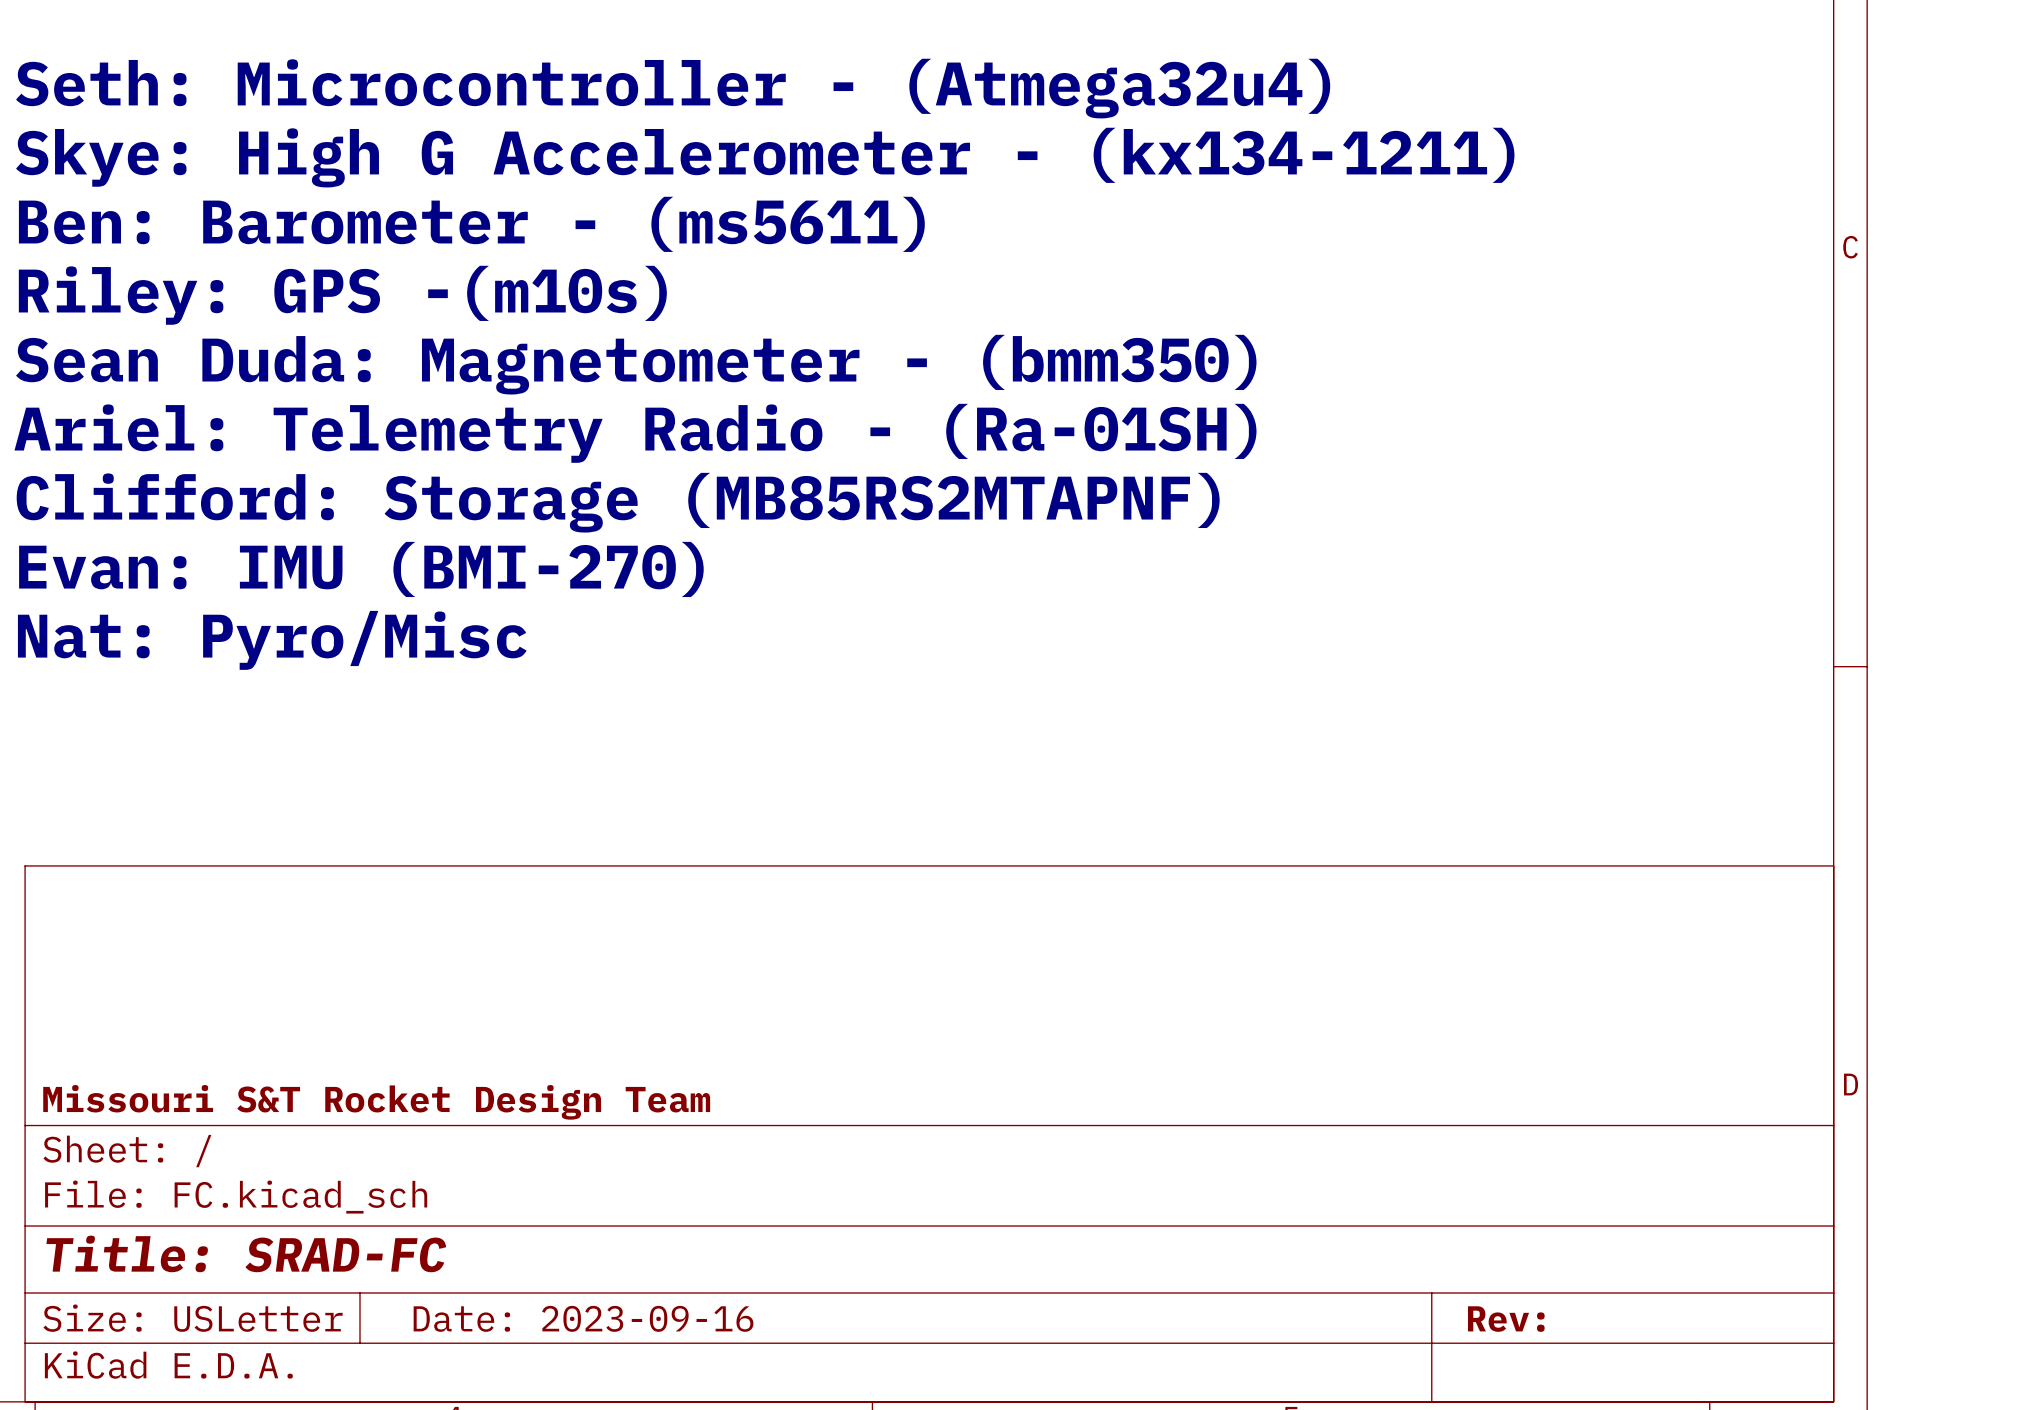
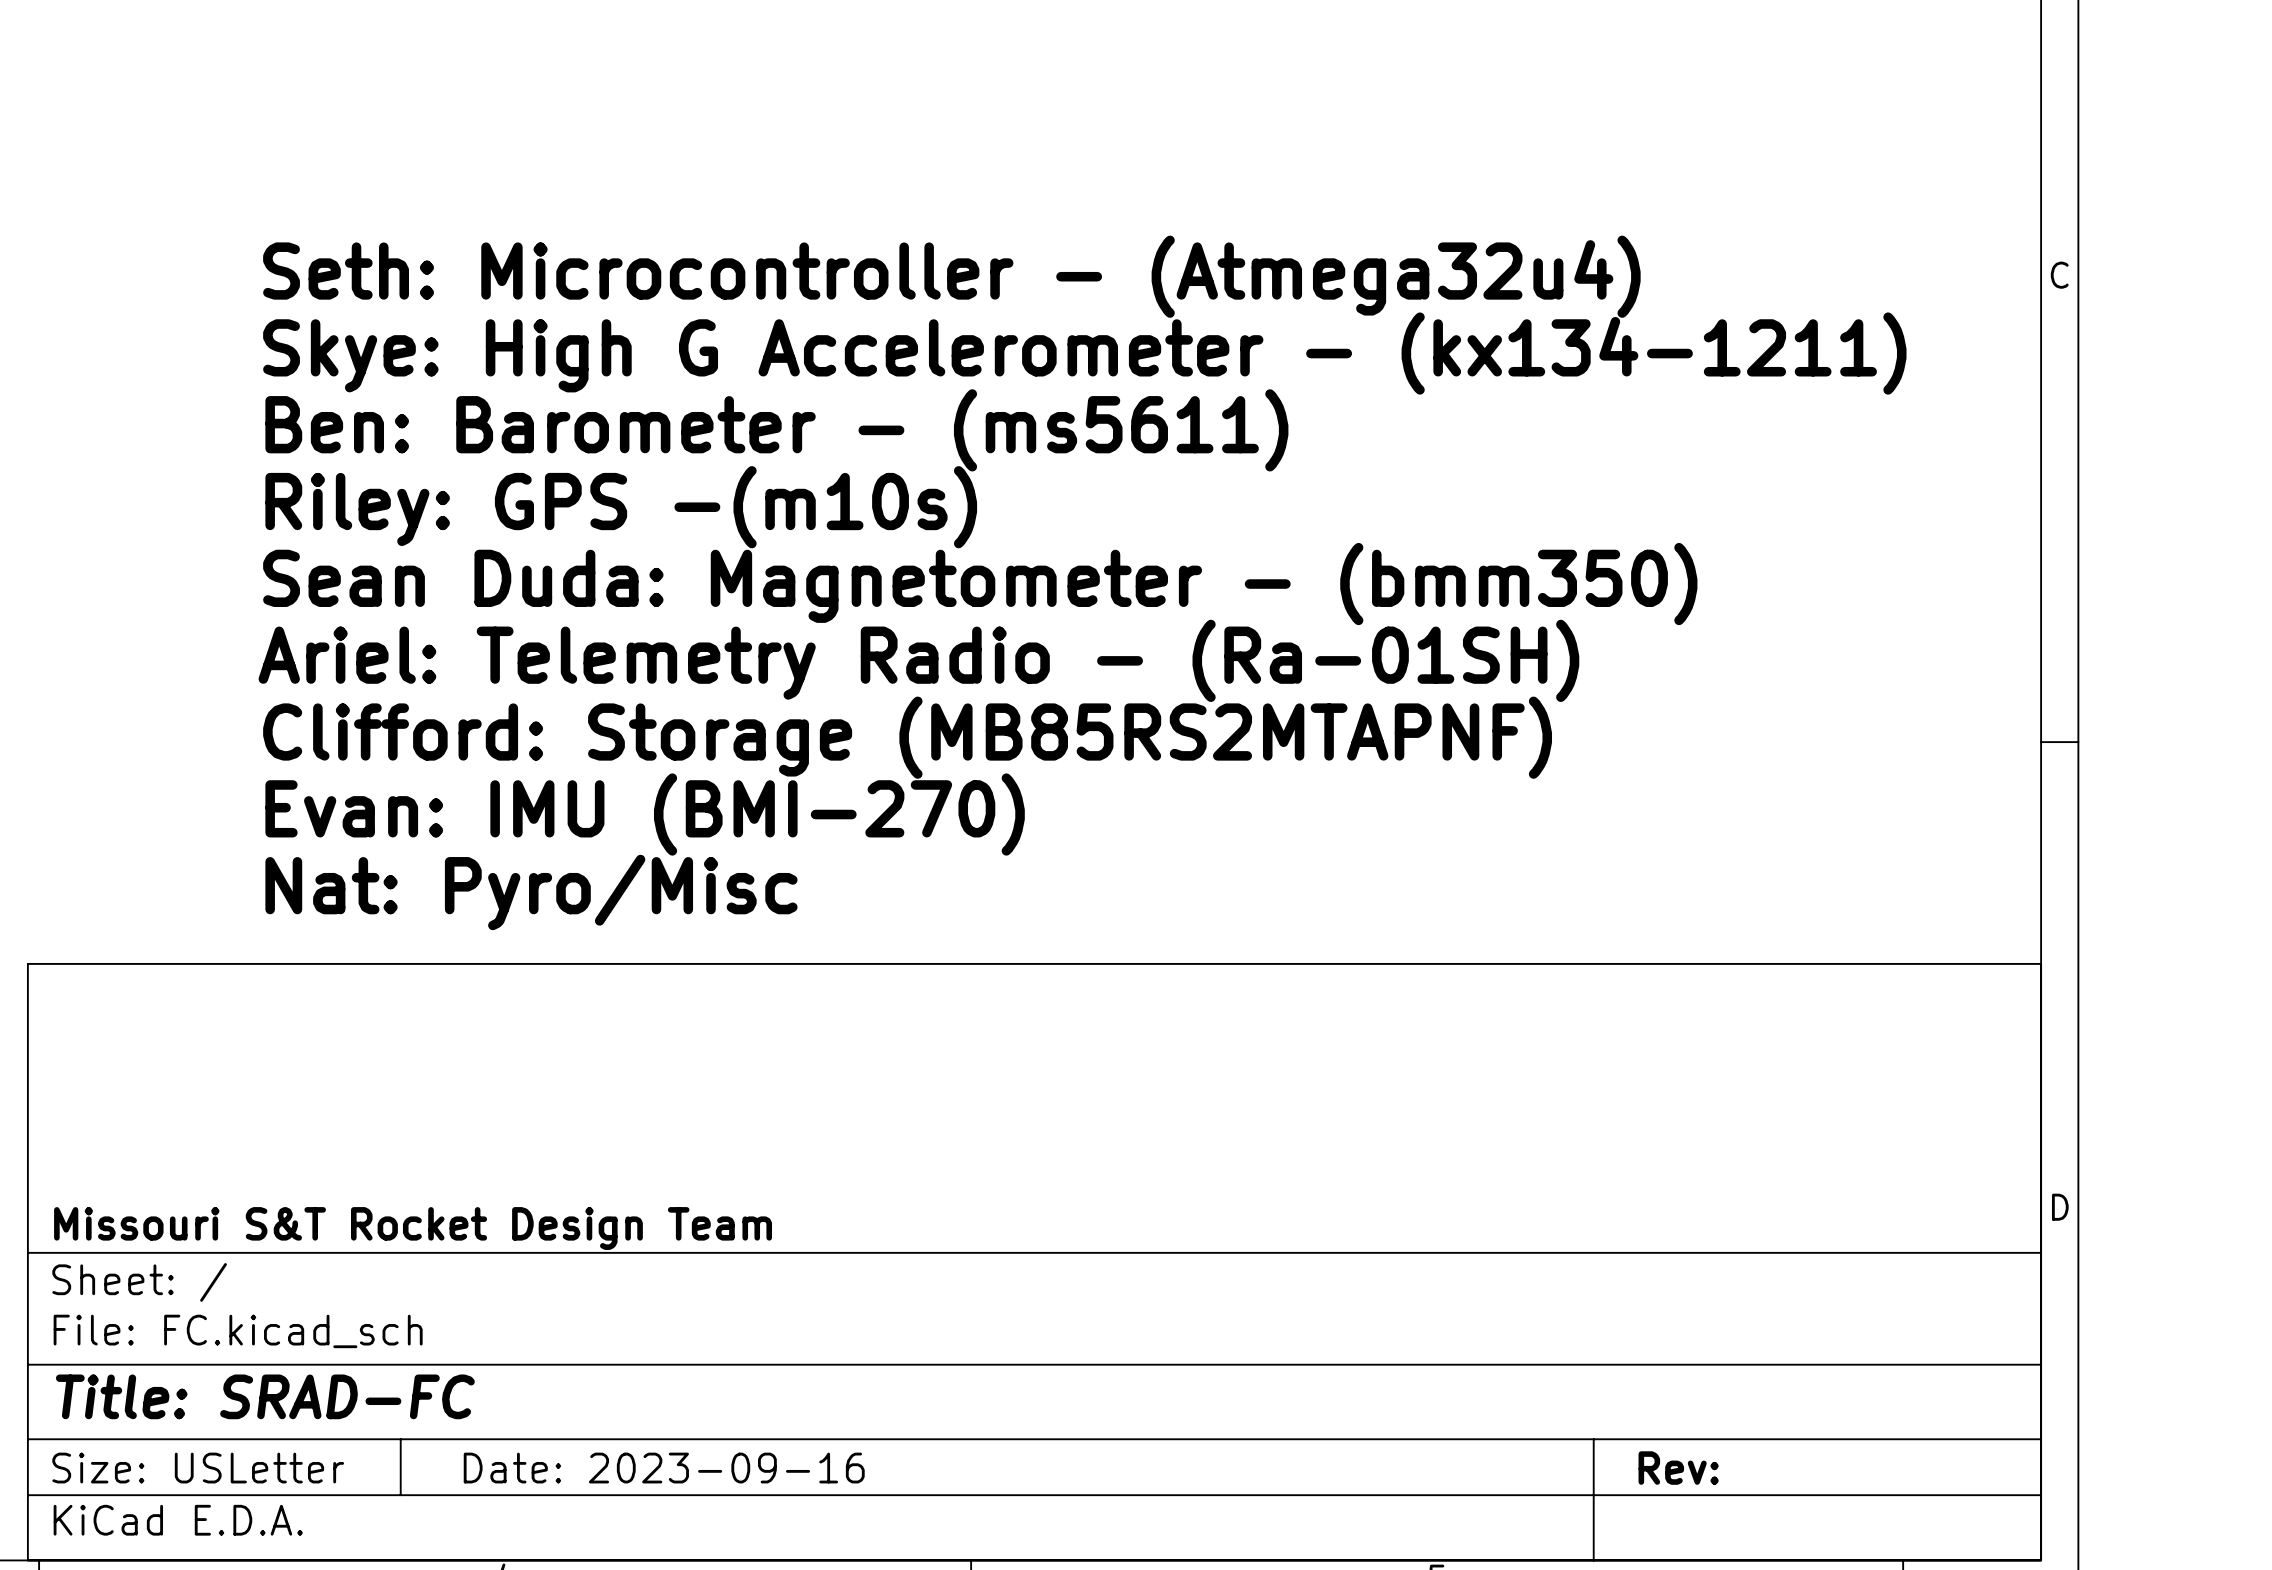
text position: Seth: Microcontroller - (Atmega32u4) (673, 88) -> Seth: Microcontroller - (Atmega32u4) (951, 276)
text position: Skye: High G Accelerometer - (kx134-1211) (765, 157) -> Skye: High G Accelerometer - (kx134-1211) (1084, 353)
text position: Ben: Barometer - (ms5611) (471, 224) -> Ben: Barometer - (ms5611) (776, 430)
text position: Riley: GPS -(m10s) (342, 295) -> Riley: GPS -(m10s) (621, 507)
text position: Sean Duda: Magnetometer - (bmm350) (636, 364) -> Sean Duda: Magnetometer - (bmm350) (980, 584)
text position: Ariel: Telemetry Radio - (Ra-01SH) (635, 433) -> Ariel: Telemetry Radio - (Ra-01SH) (918, 660)
text position: Clifford: Storage (MB85RS2MTAPNF) (618, 502) -> Clifford: Storage (MB85RS2MTAPNF) (907, 737)
text position: Evan: IMU (BMI-270) (361, 569) -> Evan: IMU (BMI-270) (645, 814)
text position: Nat: Pyro/Misc (272, 640) -> Nat: Pyro/Misc (531, 892)

